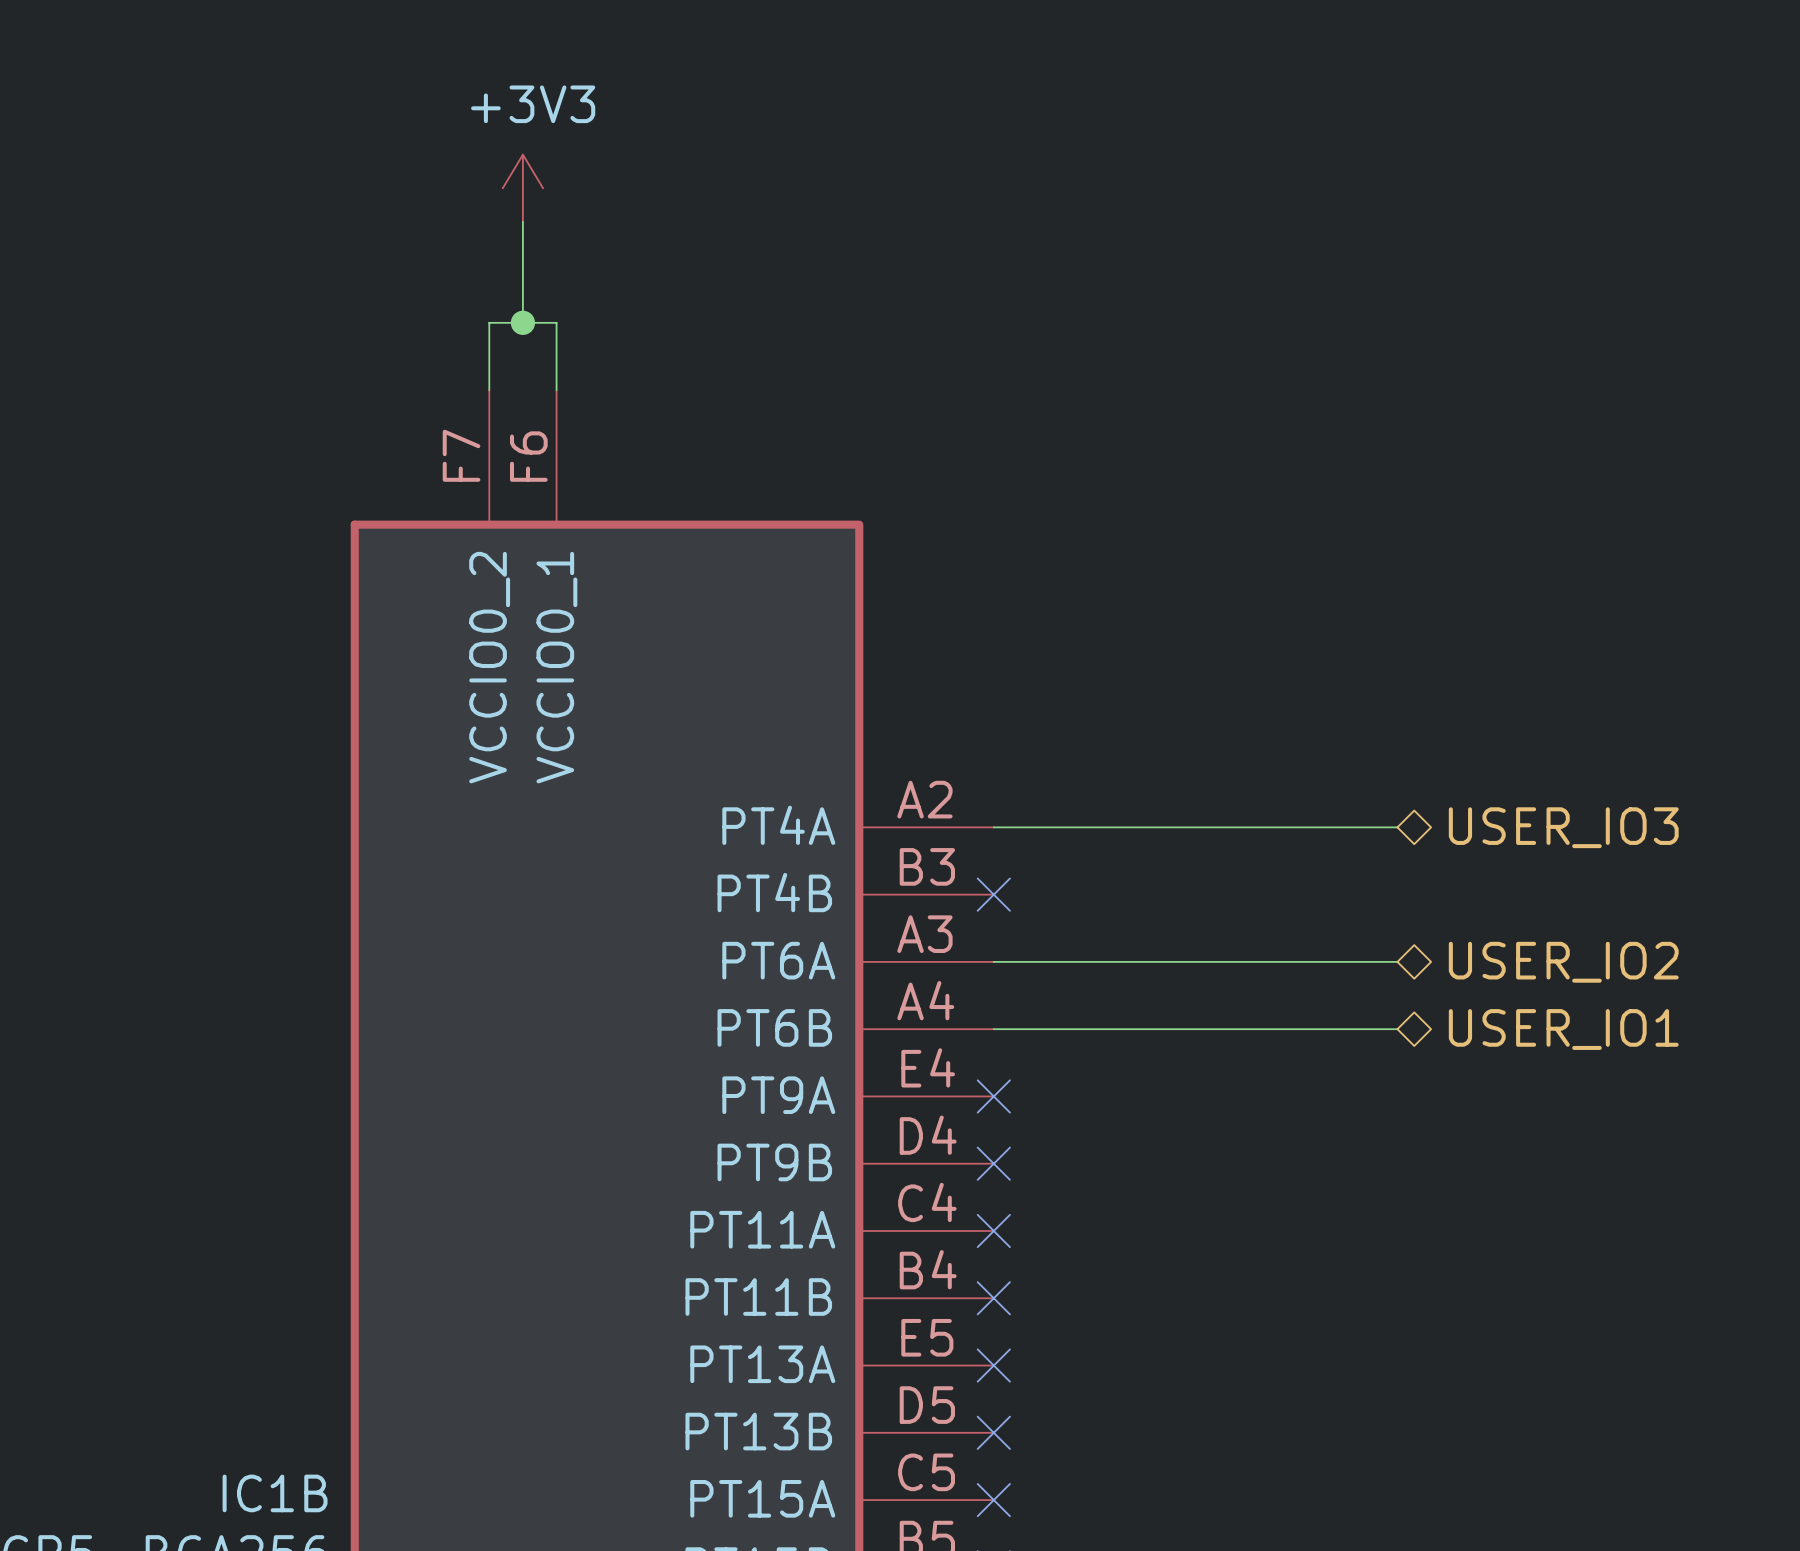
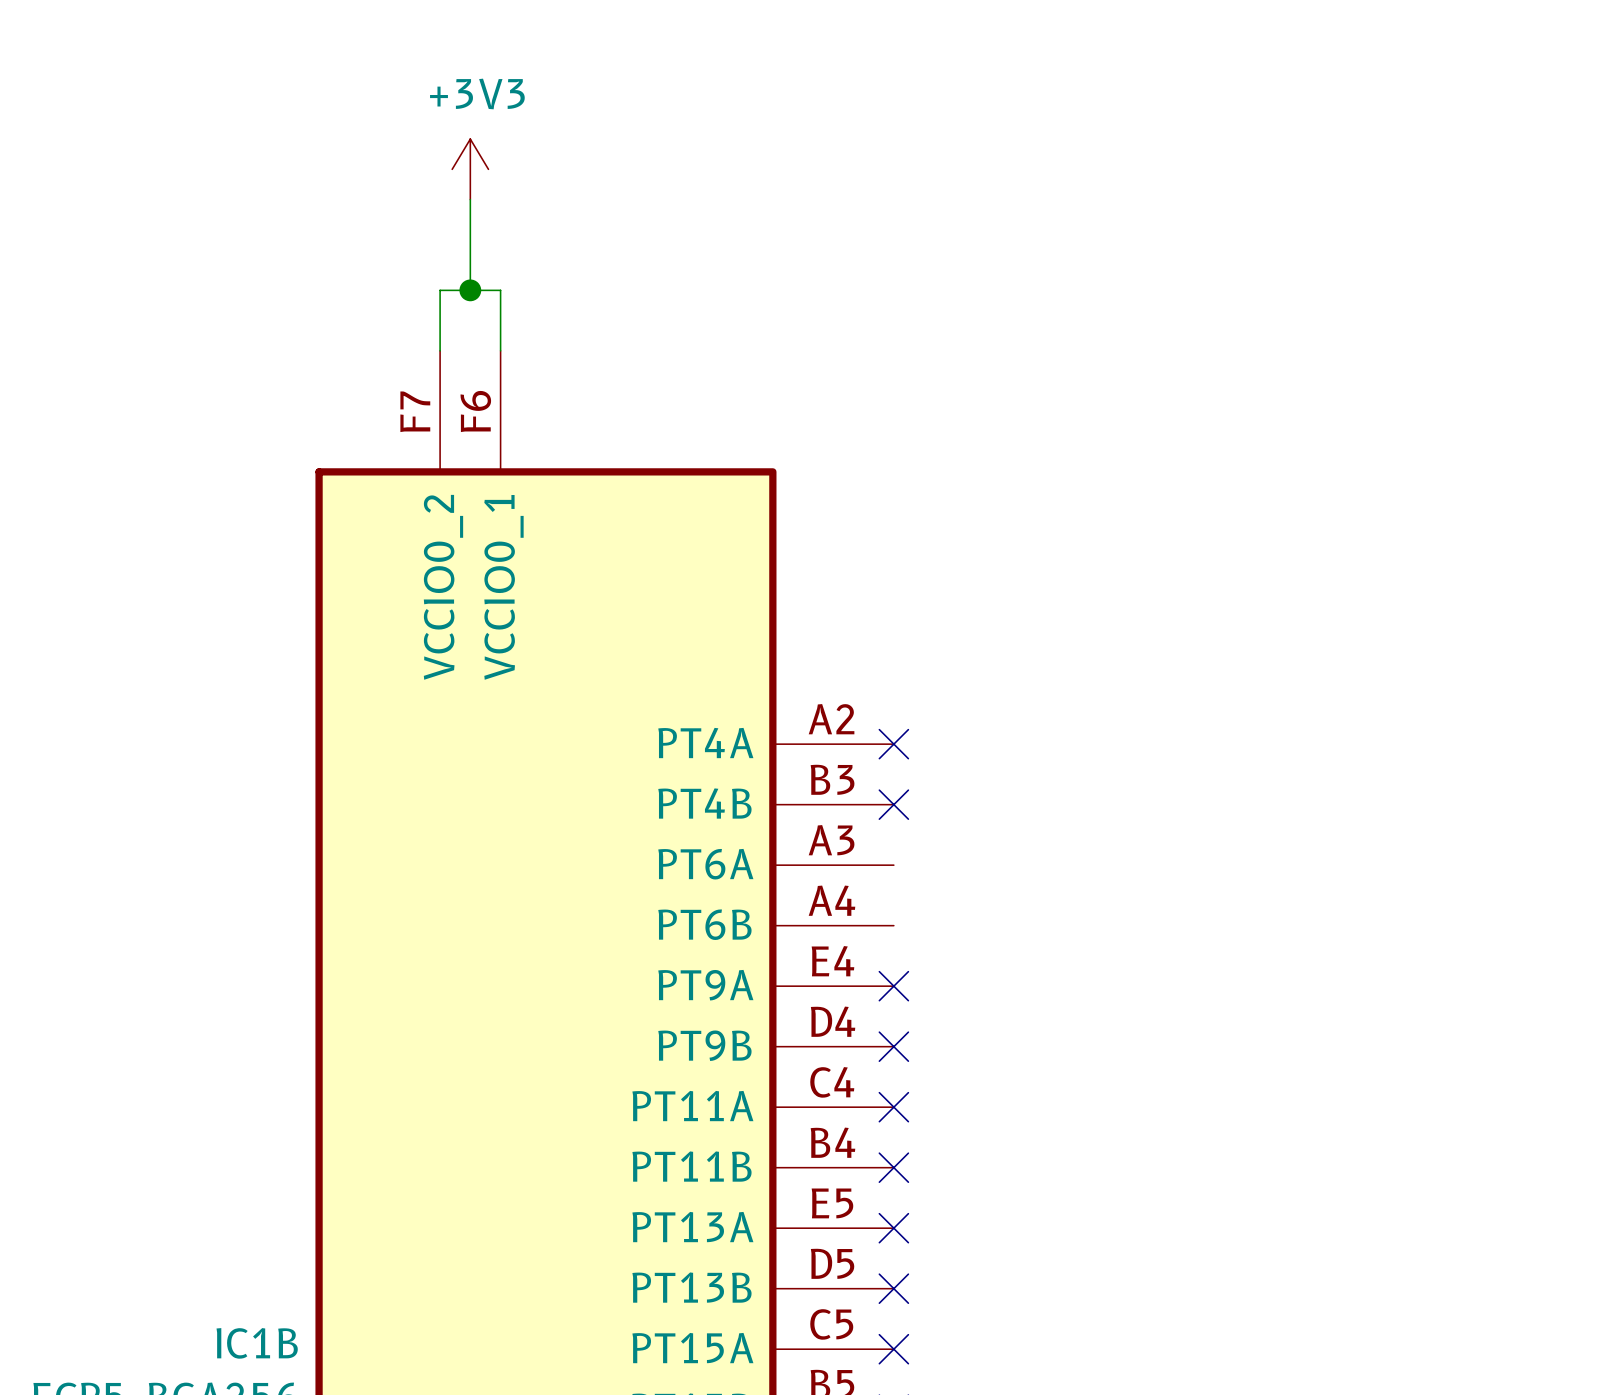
wire: (993, 827) (1397, 827) -> none
no-connect mark: none -> (893, 744)
hierarchical label: USER_IO3 (1563, 827) -> none
wire: (993, 961) (1397, 961) -> none
hierarchical label: USER_IO2 (1563, 962) -> none
wire: (993, 1029) (1397, 1029) -> none
hierarchical label: USER_IO1 (1563, 1029) -> none

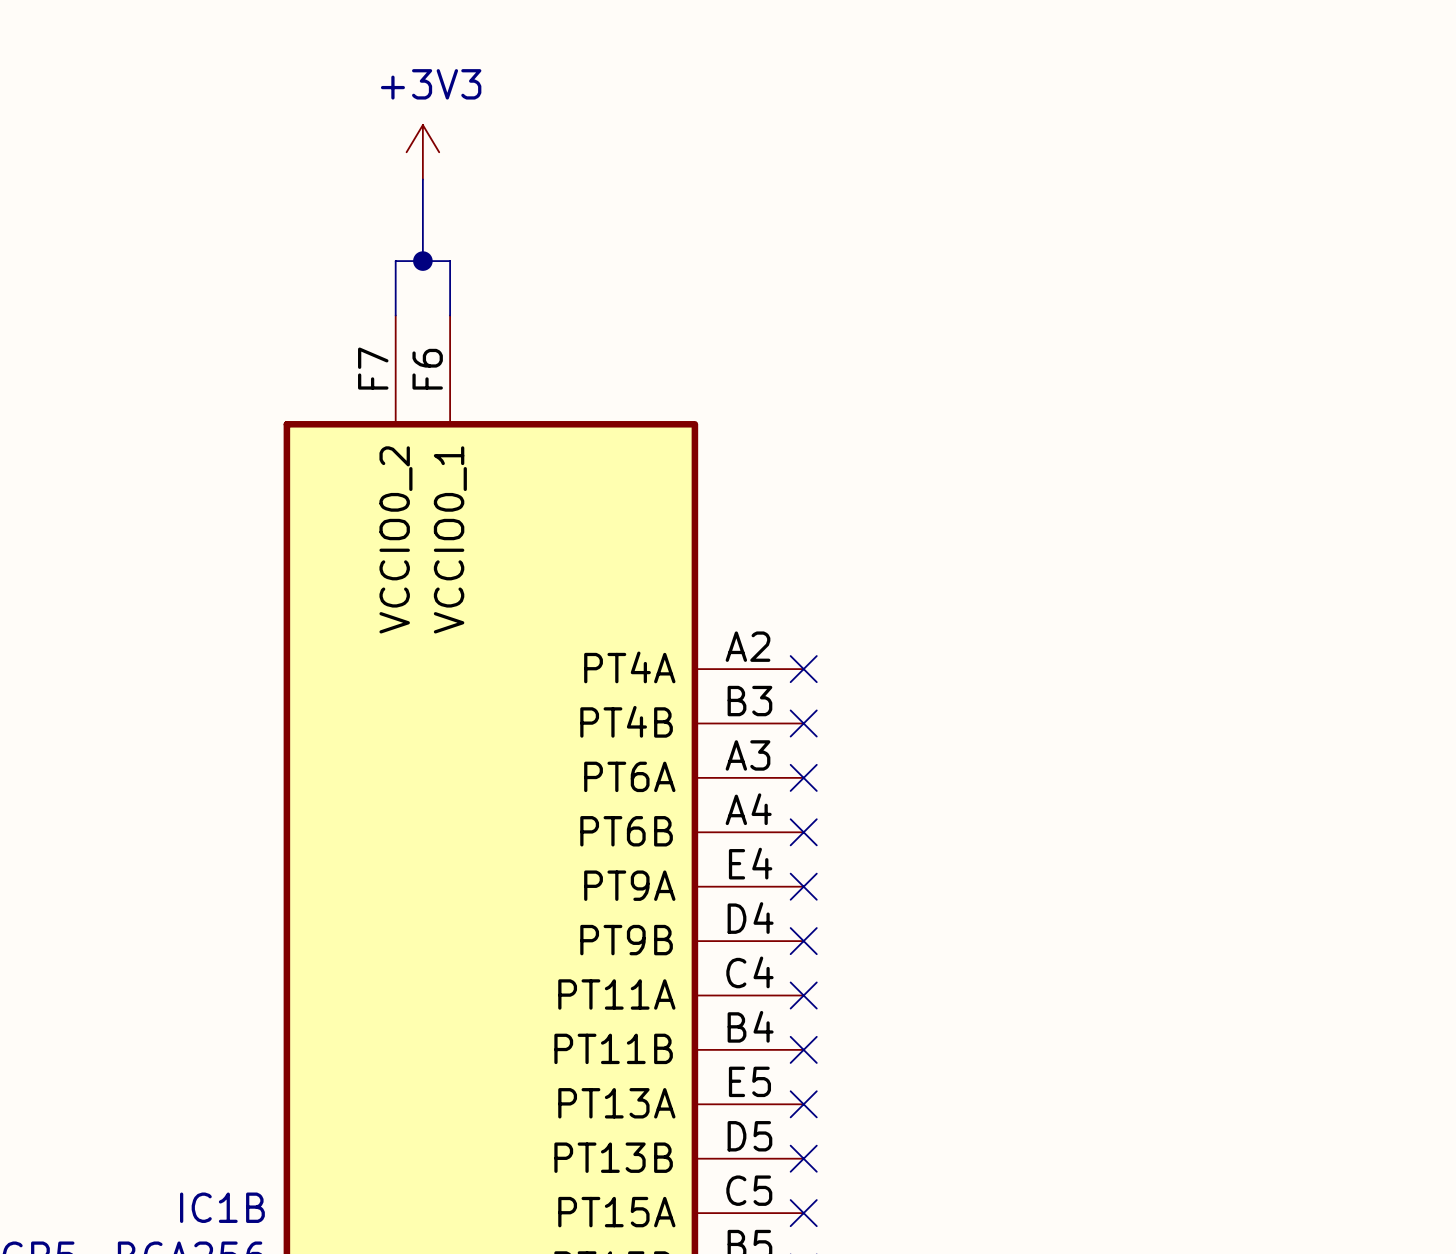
no-connect mark: none -> (803, 777)
no-connect mark: none -> (803, 832)

